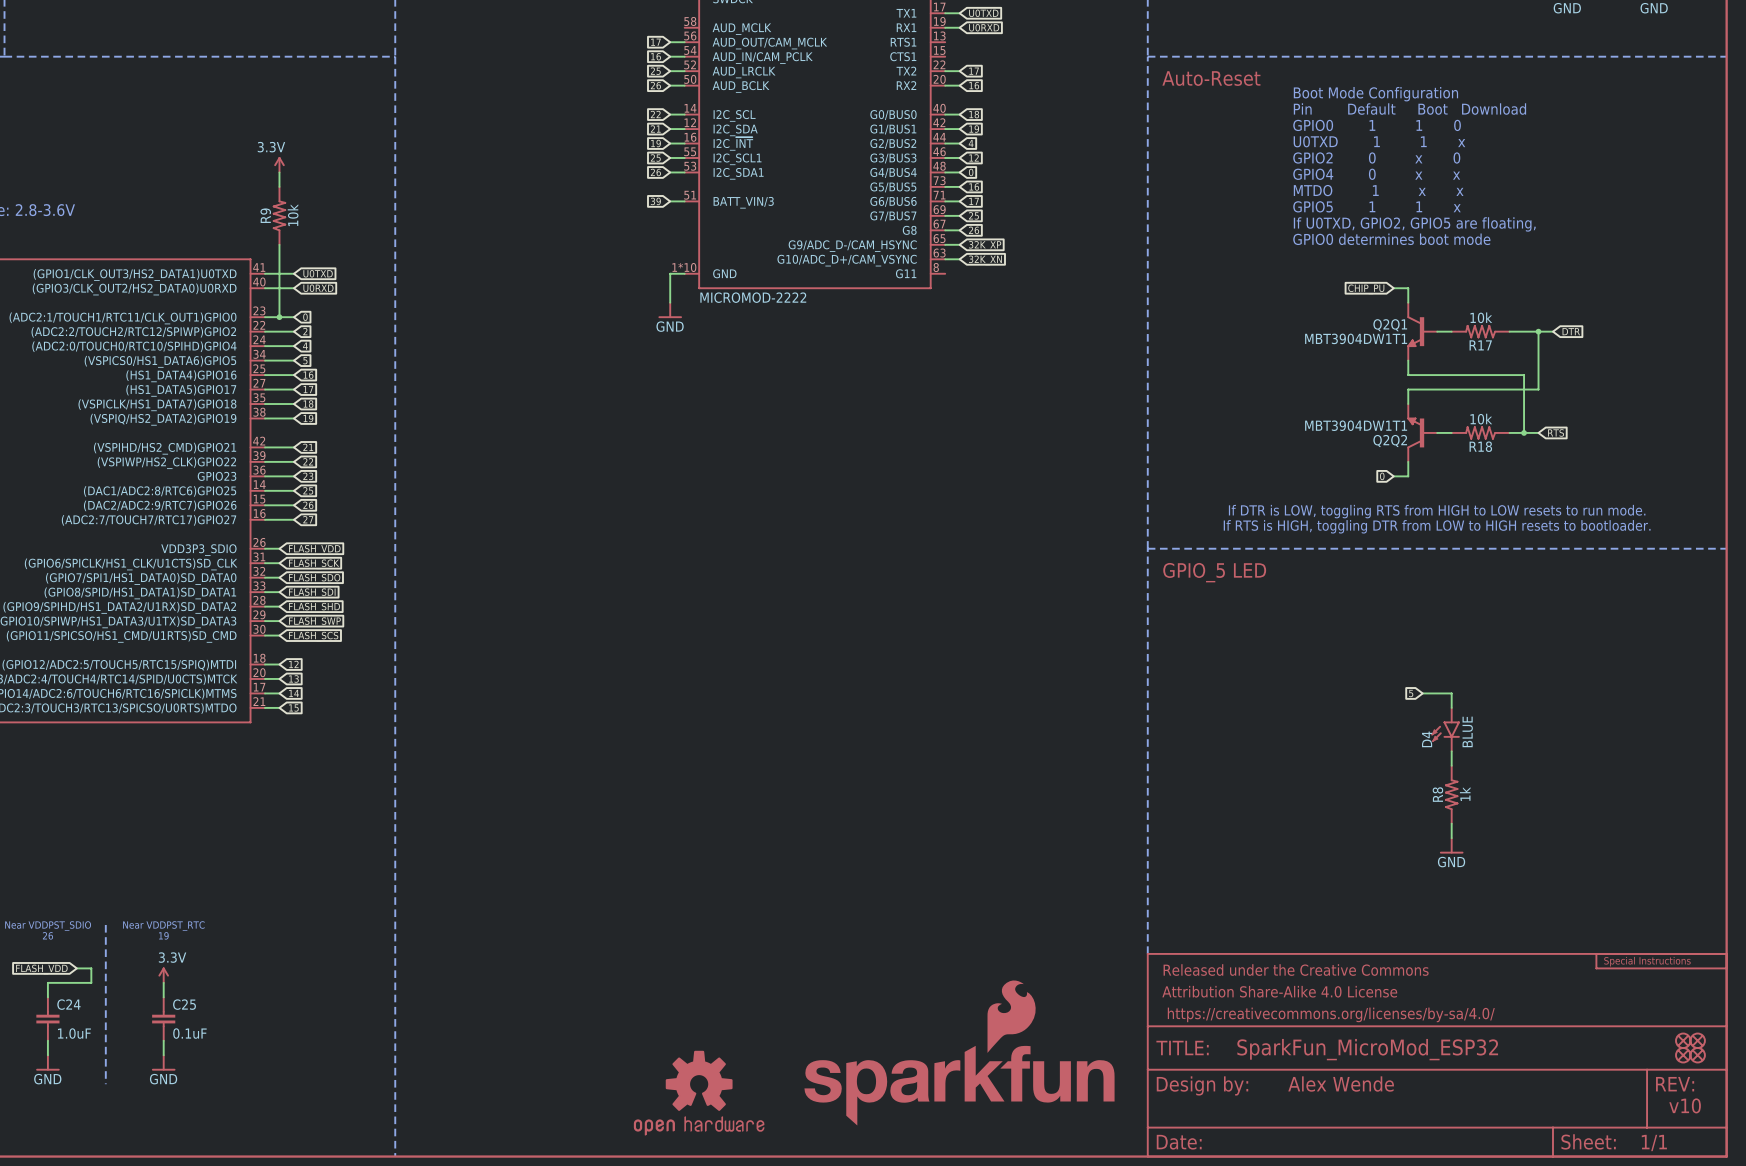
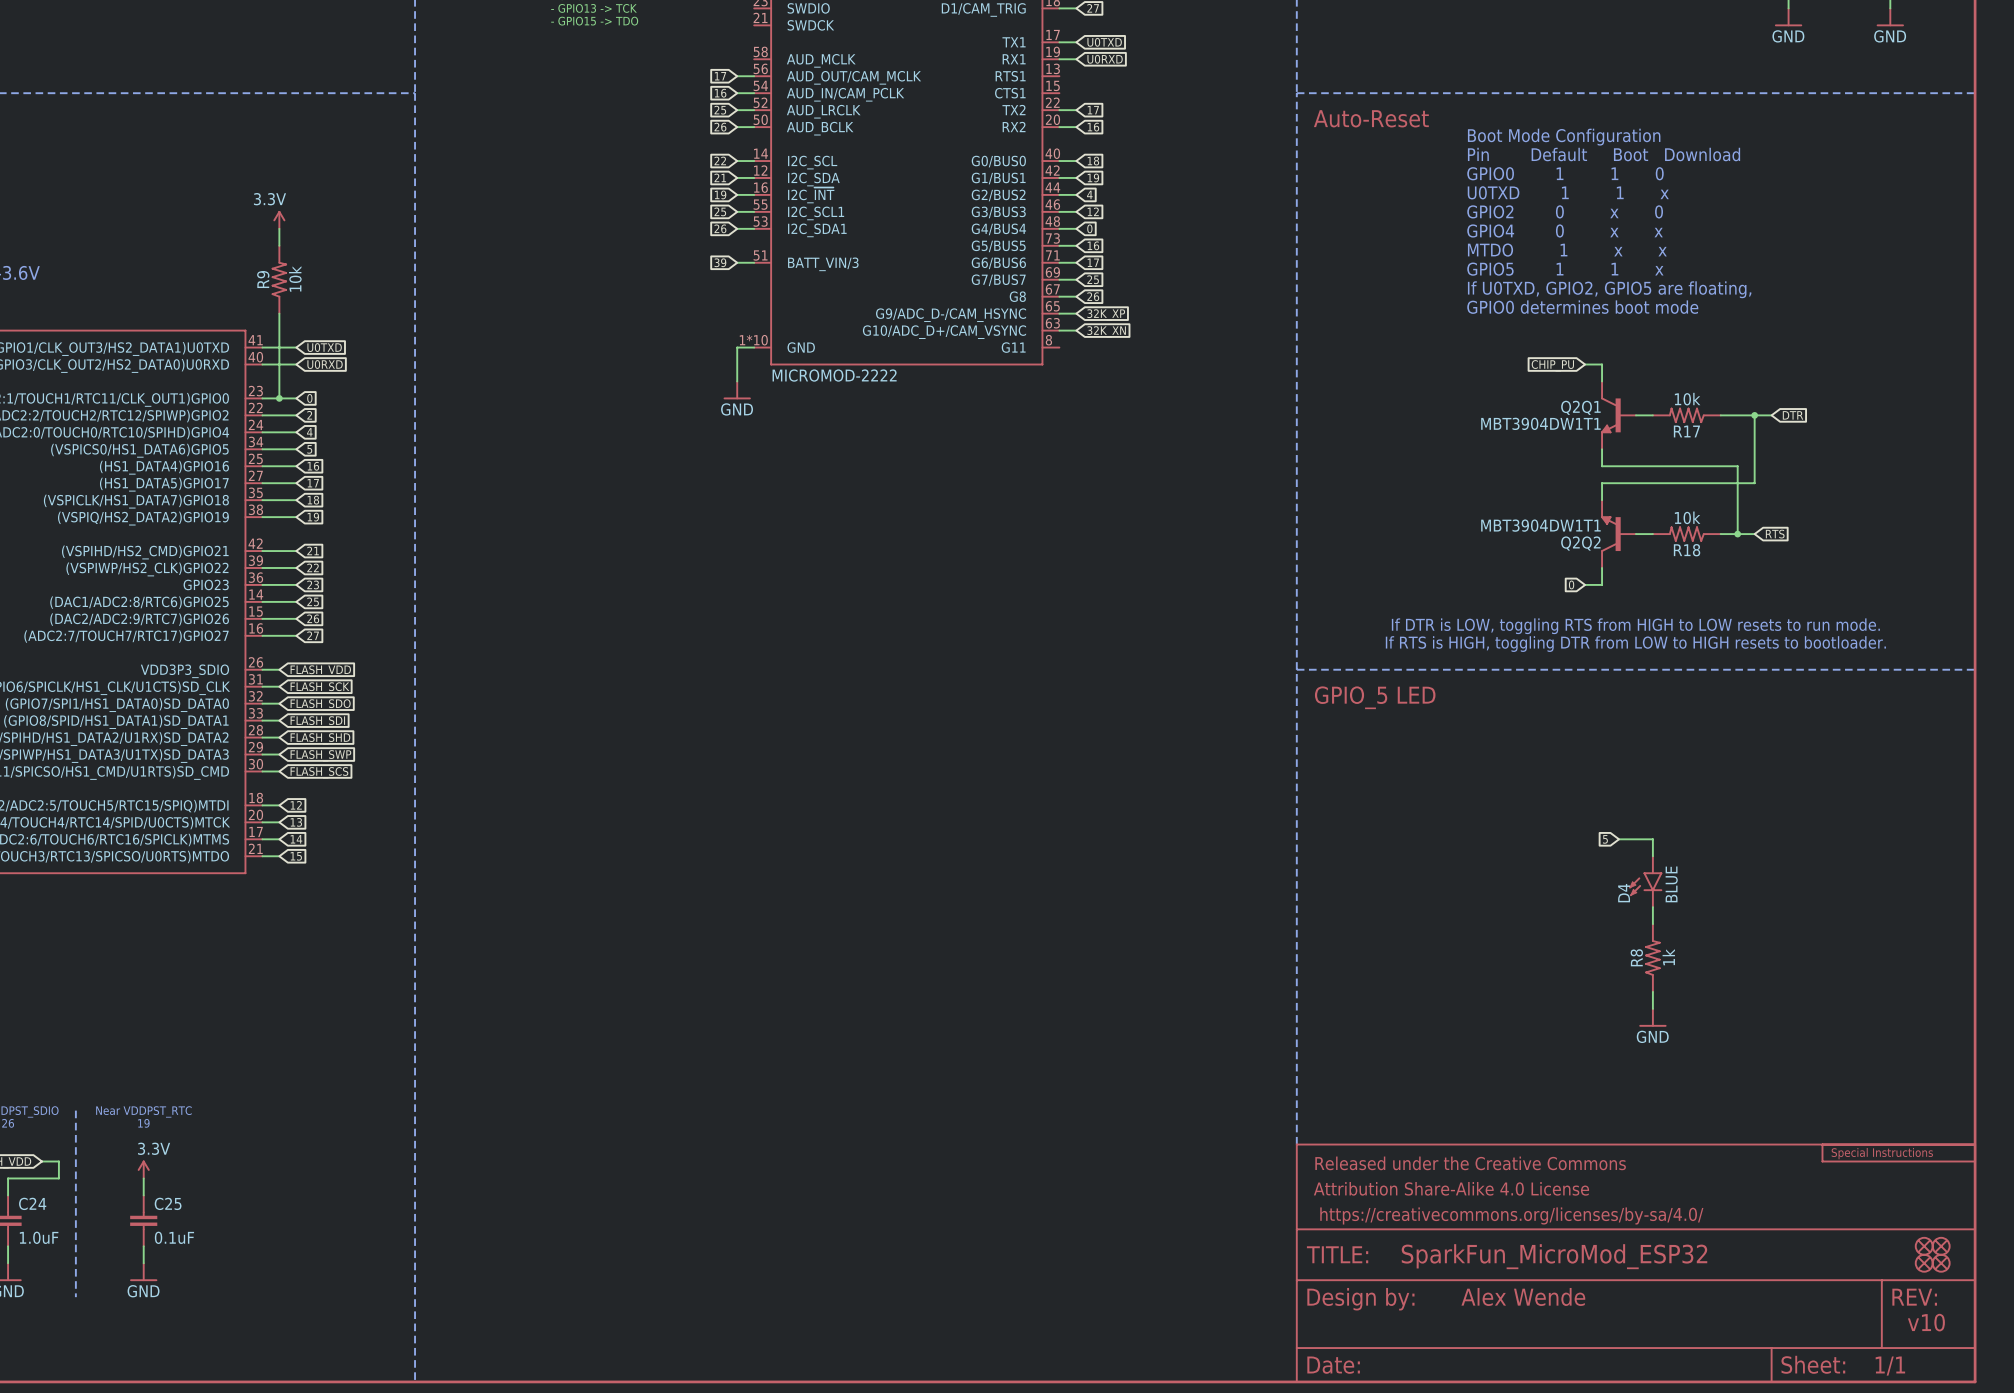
part: (959, 1052) -> none
part: (699, 1093) -> none

